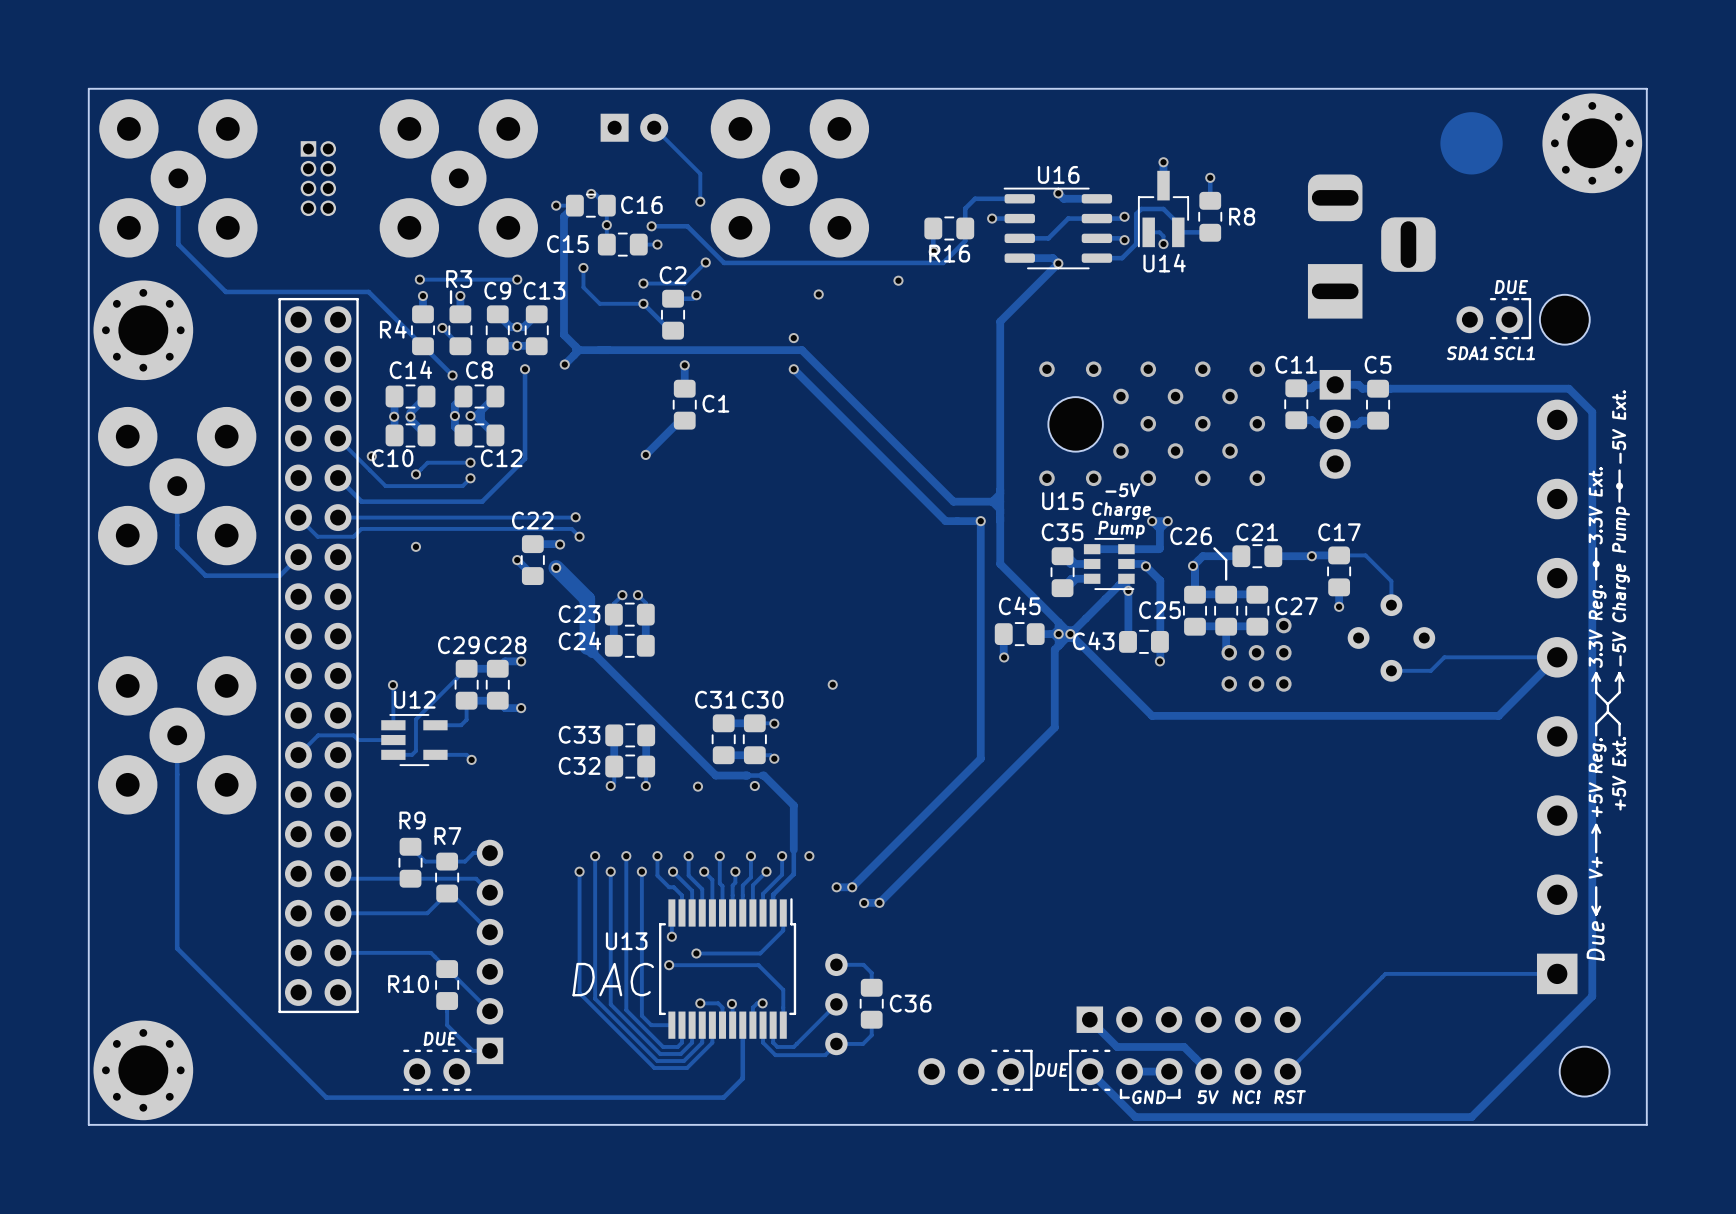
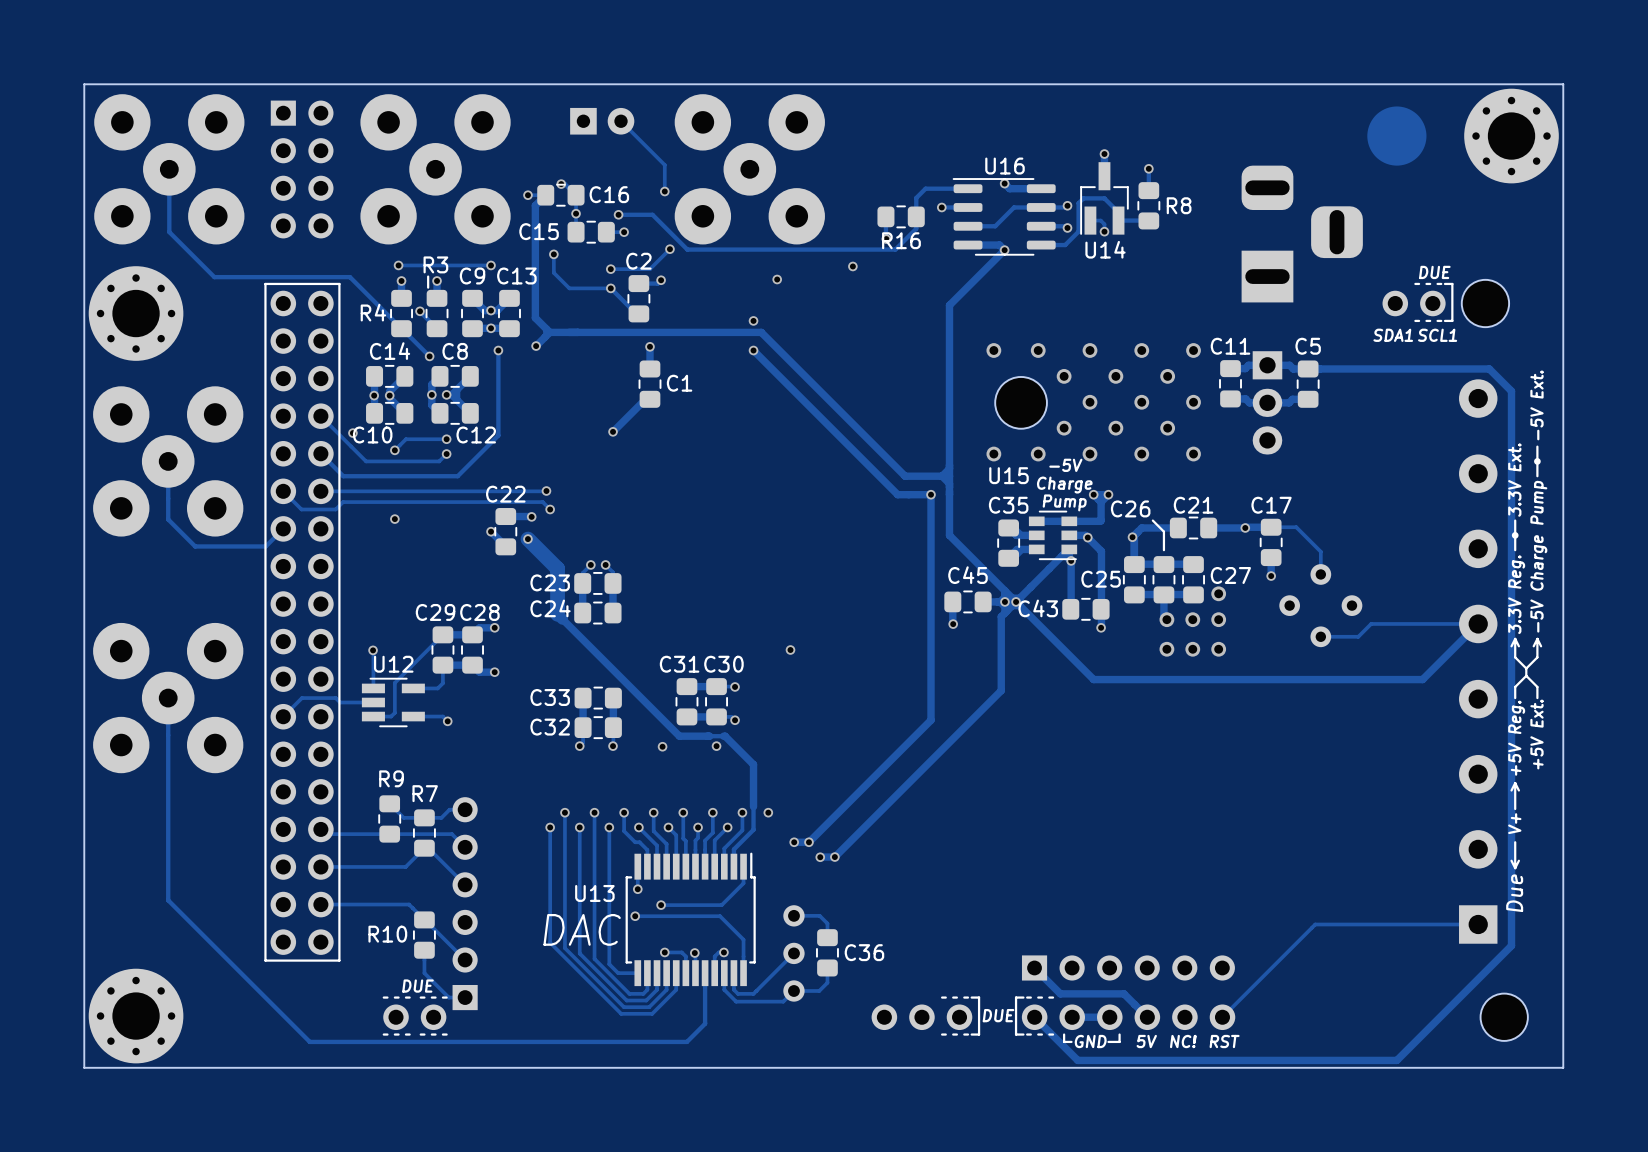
part footprint: [300, 141, 337, 217] -> [270, 100, 334, 239]

